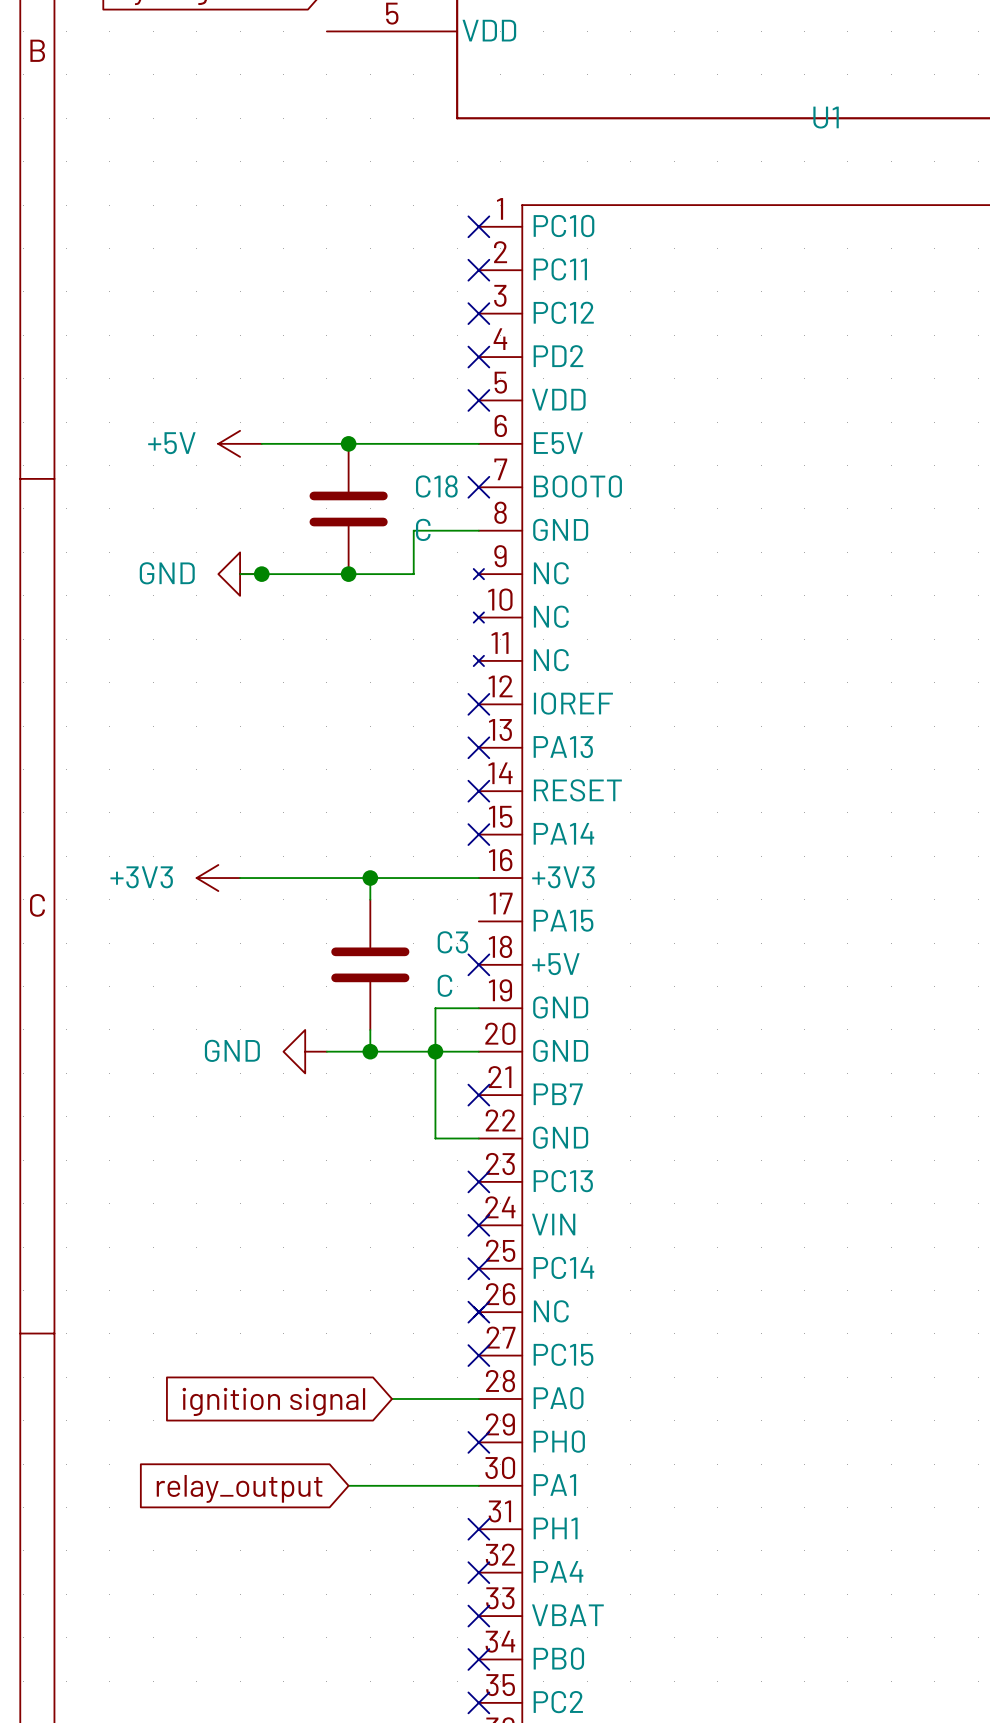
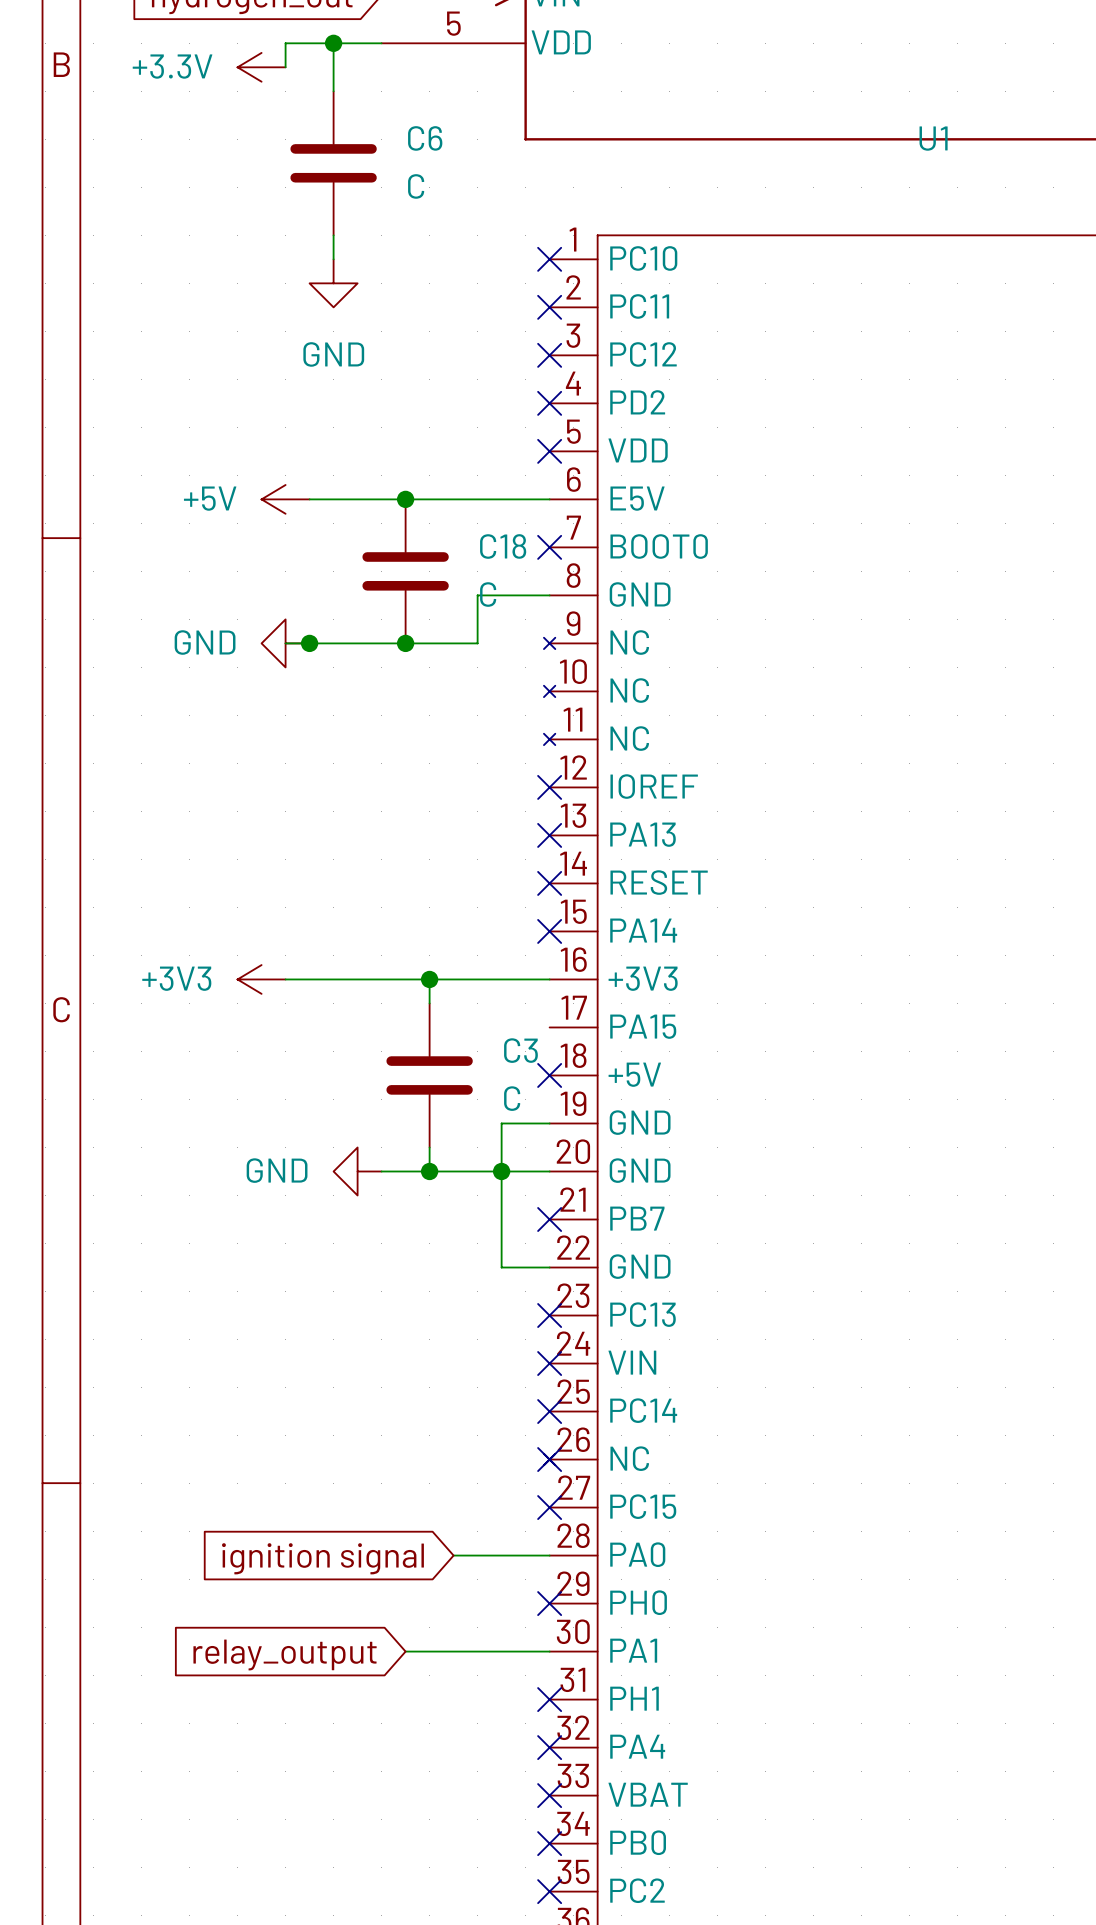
wire: none -> (333, 43) (333, 91)
junction: none -> (333, 43)
wire: none -> (381, 43) (285, 43) (285, 67)
power symbol: none -> +3.3V (261, 67)
C6: none -> C (333, 163)
wire: none -> (333, 235) (333, 259)
power symbol: none -> GND (333, 283)

